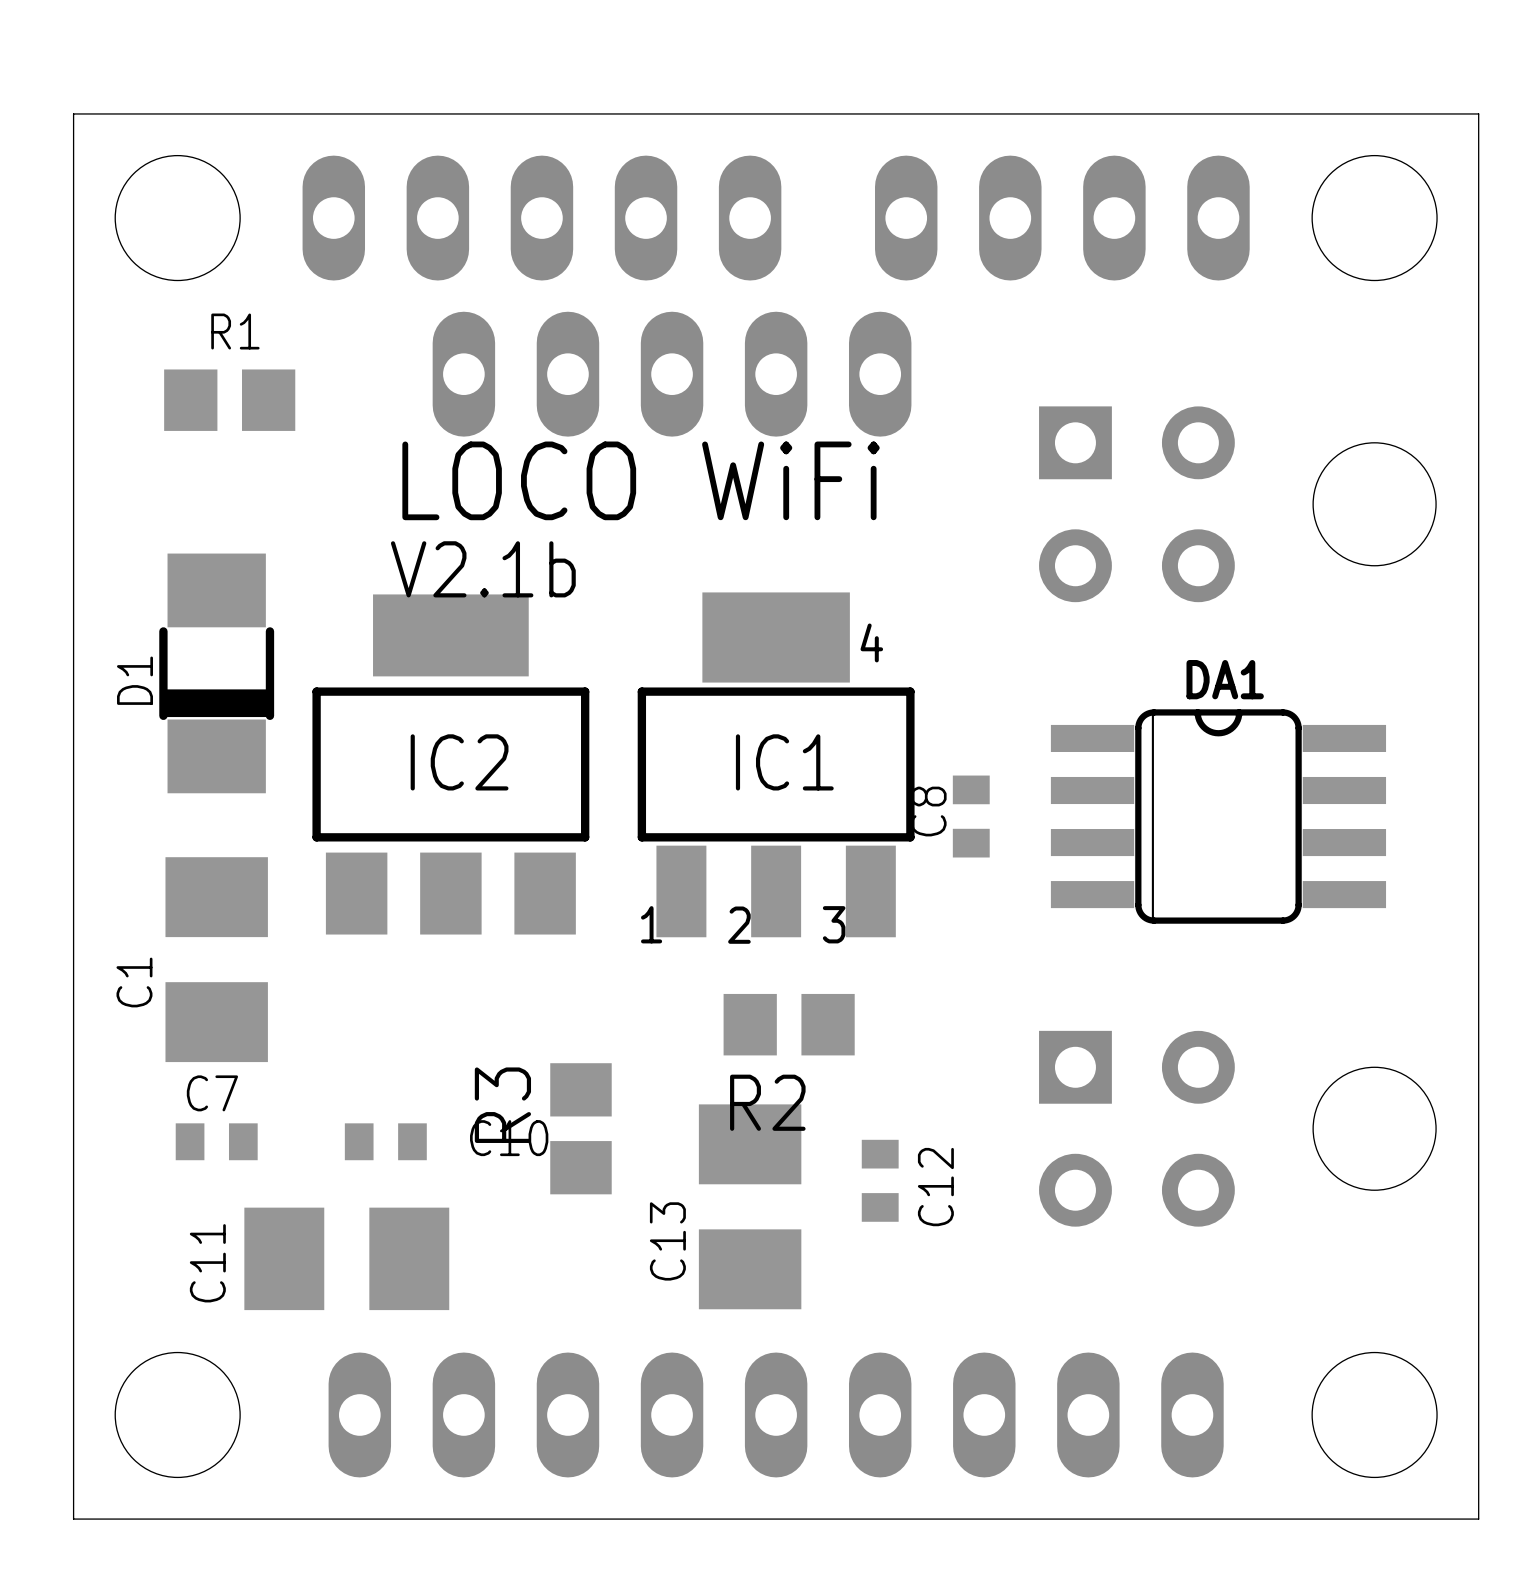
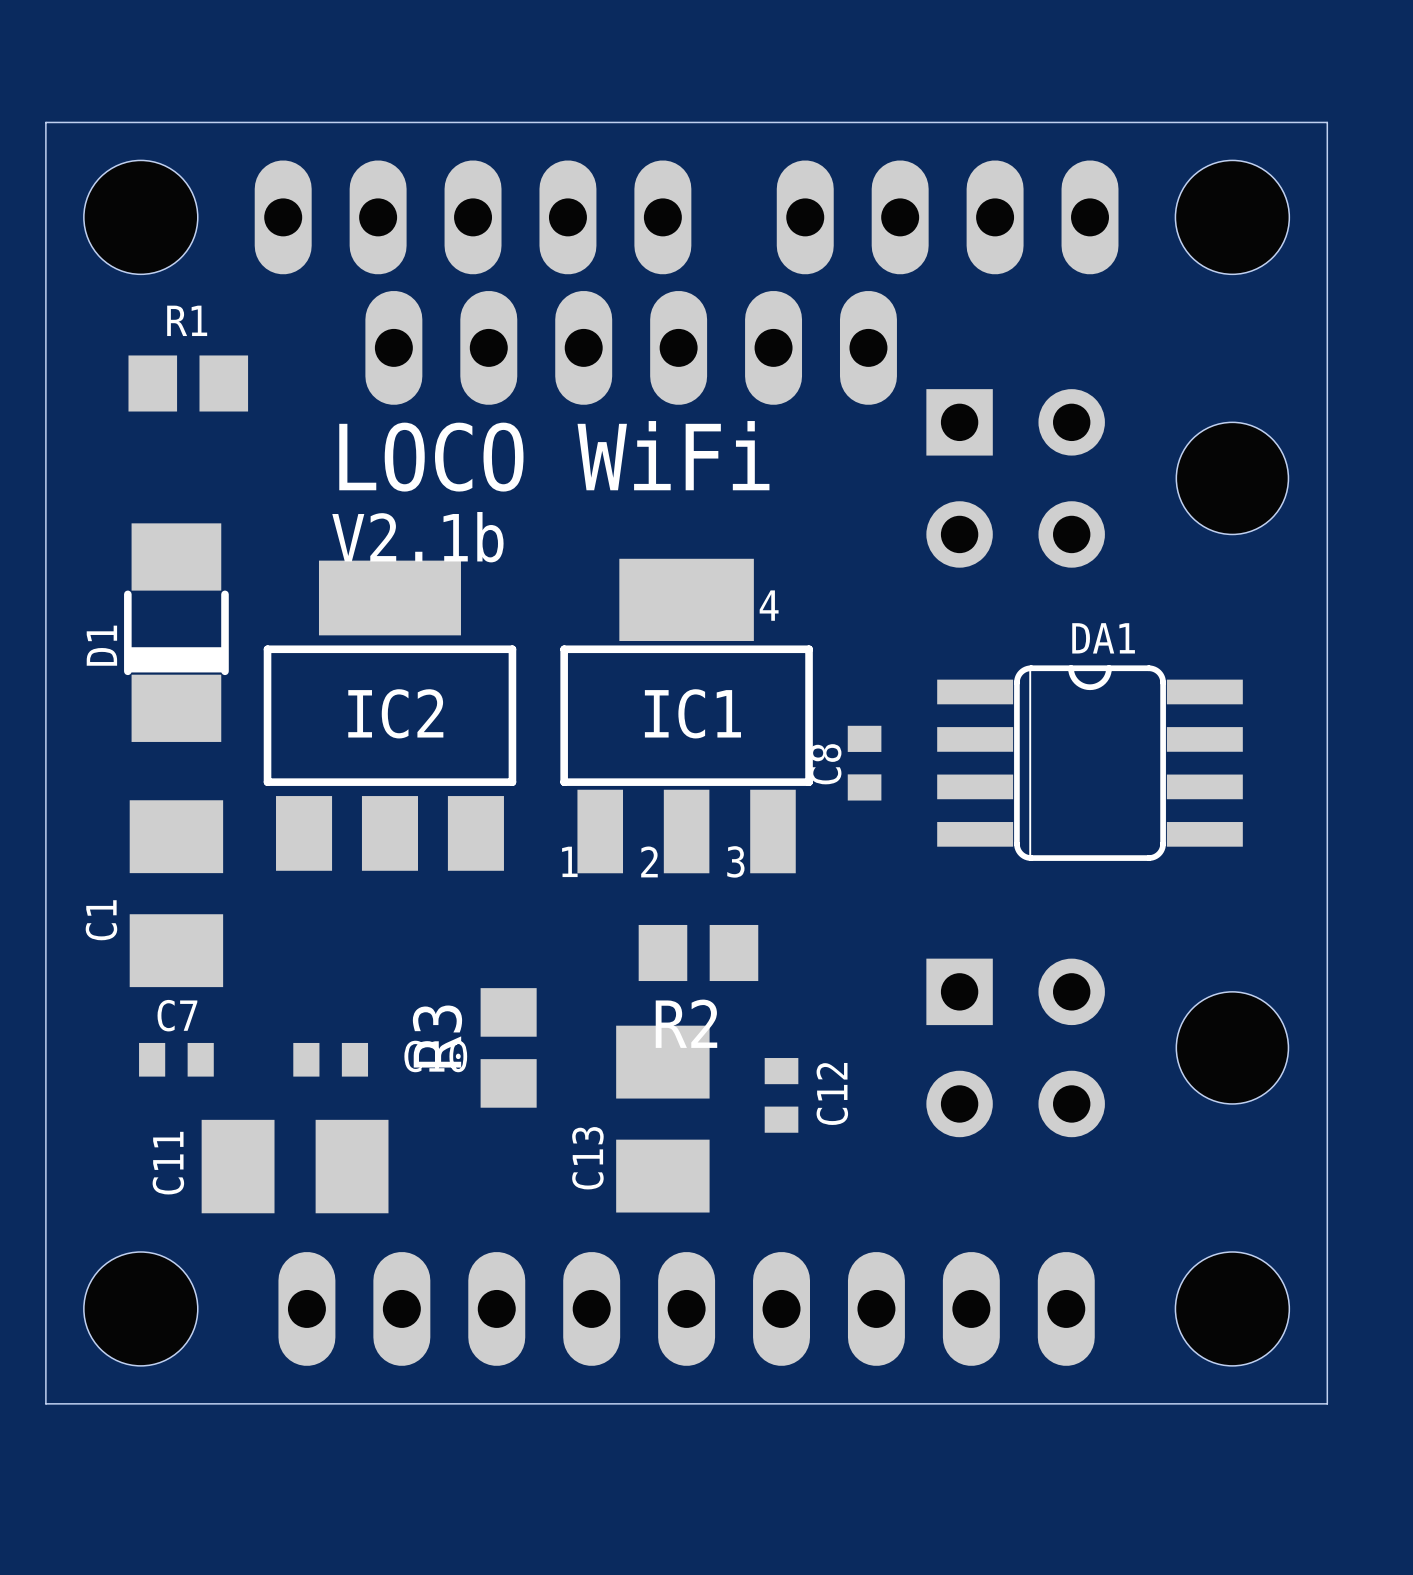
part: none -> (631, 347)
part: (672, 374) -> none

